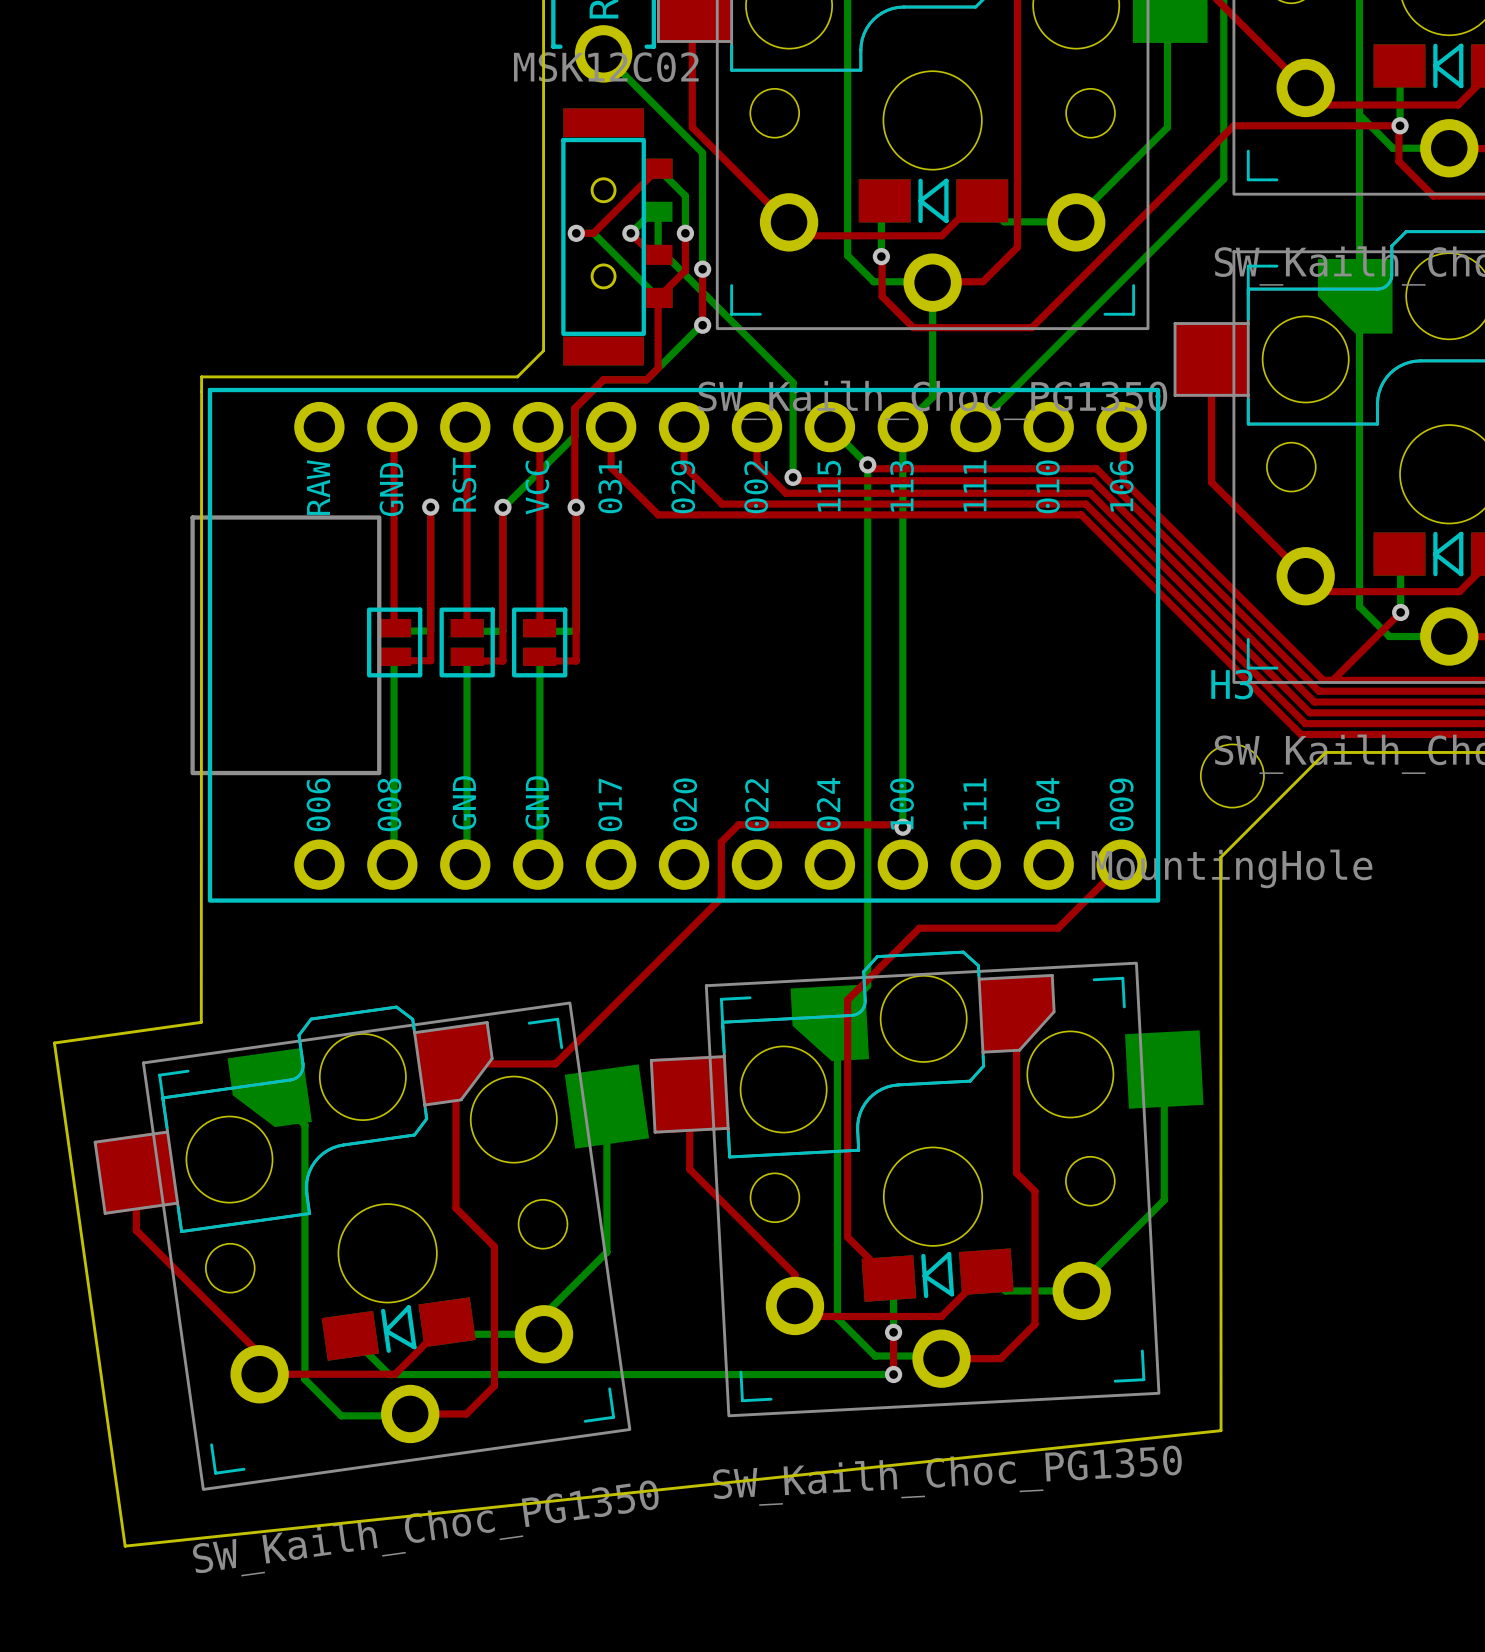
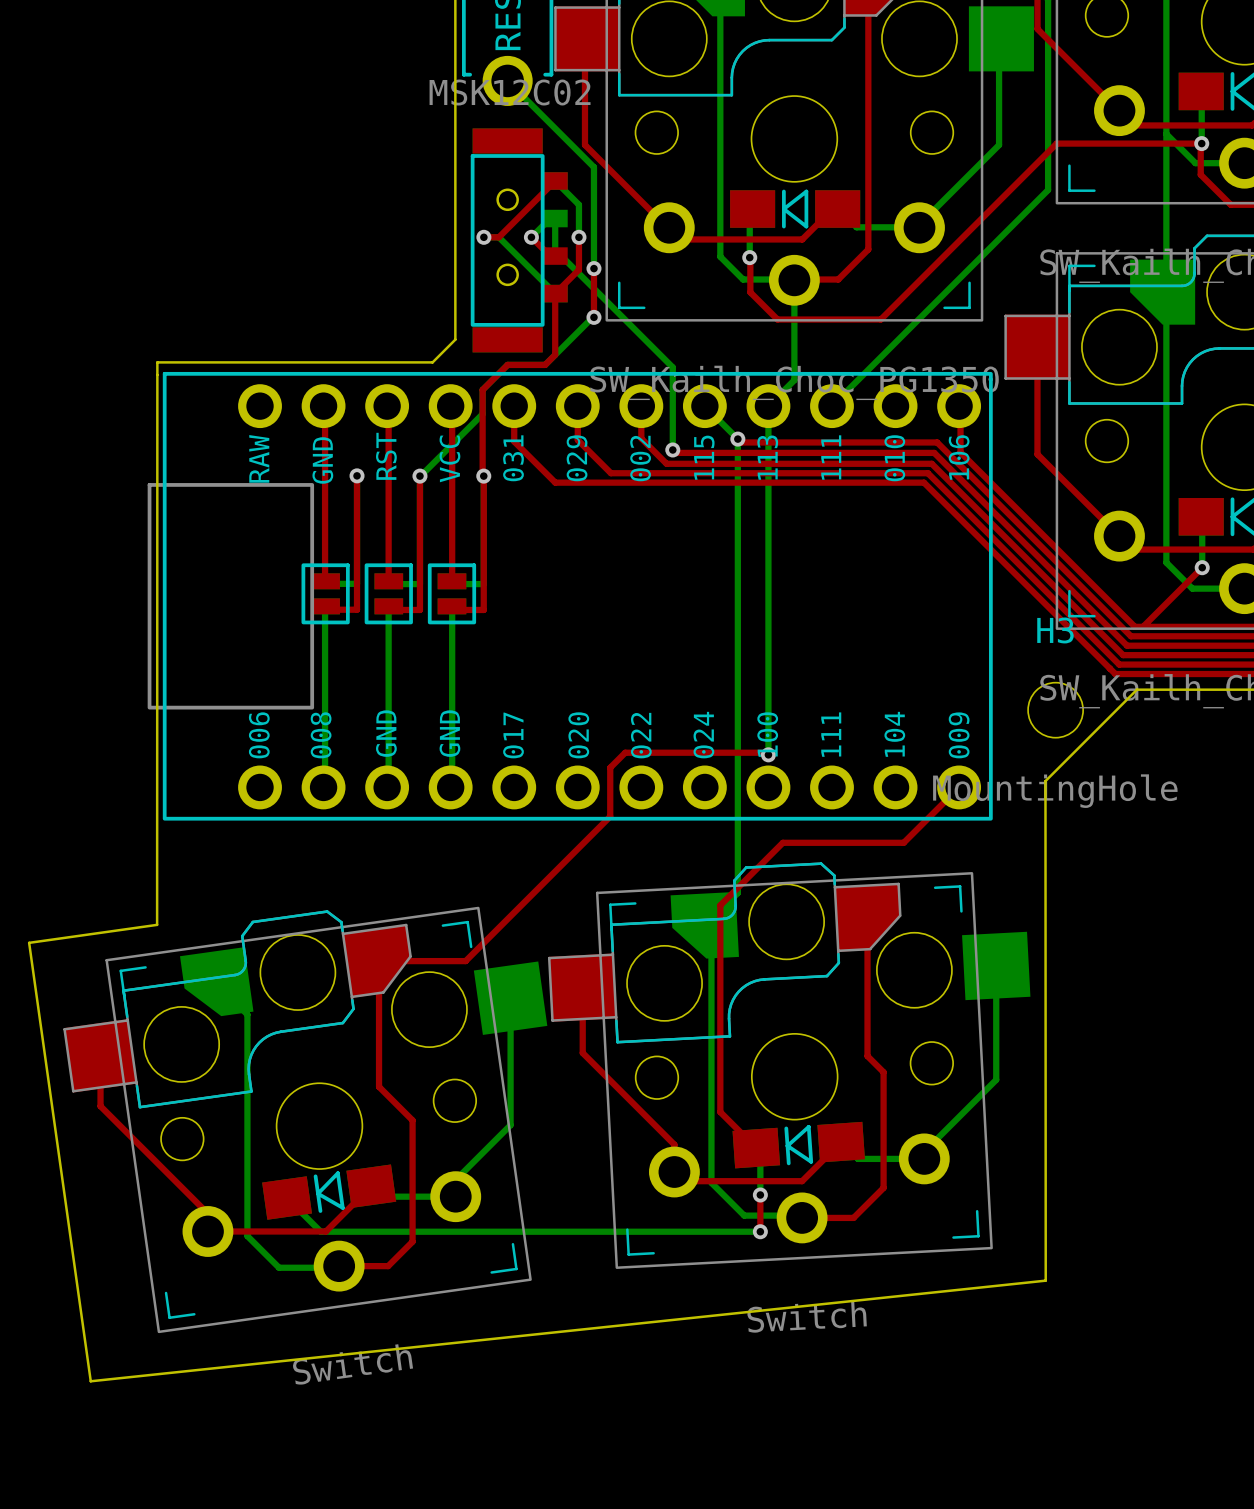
part value: SW_Kailh_Choc_PG1350 (947, 1475) -> Switch (807, 1316)
part value: SW_Kailh_Choc_PG1350 (425, 1528) -> Switch (352, 1364)

